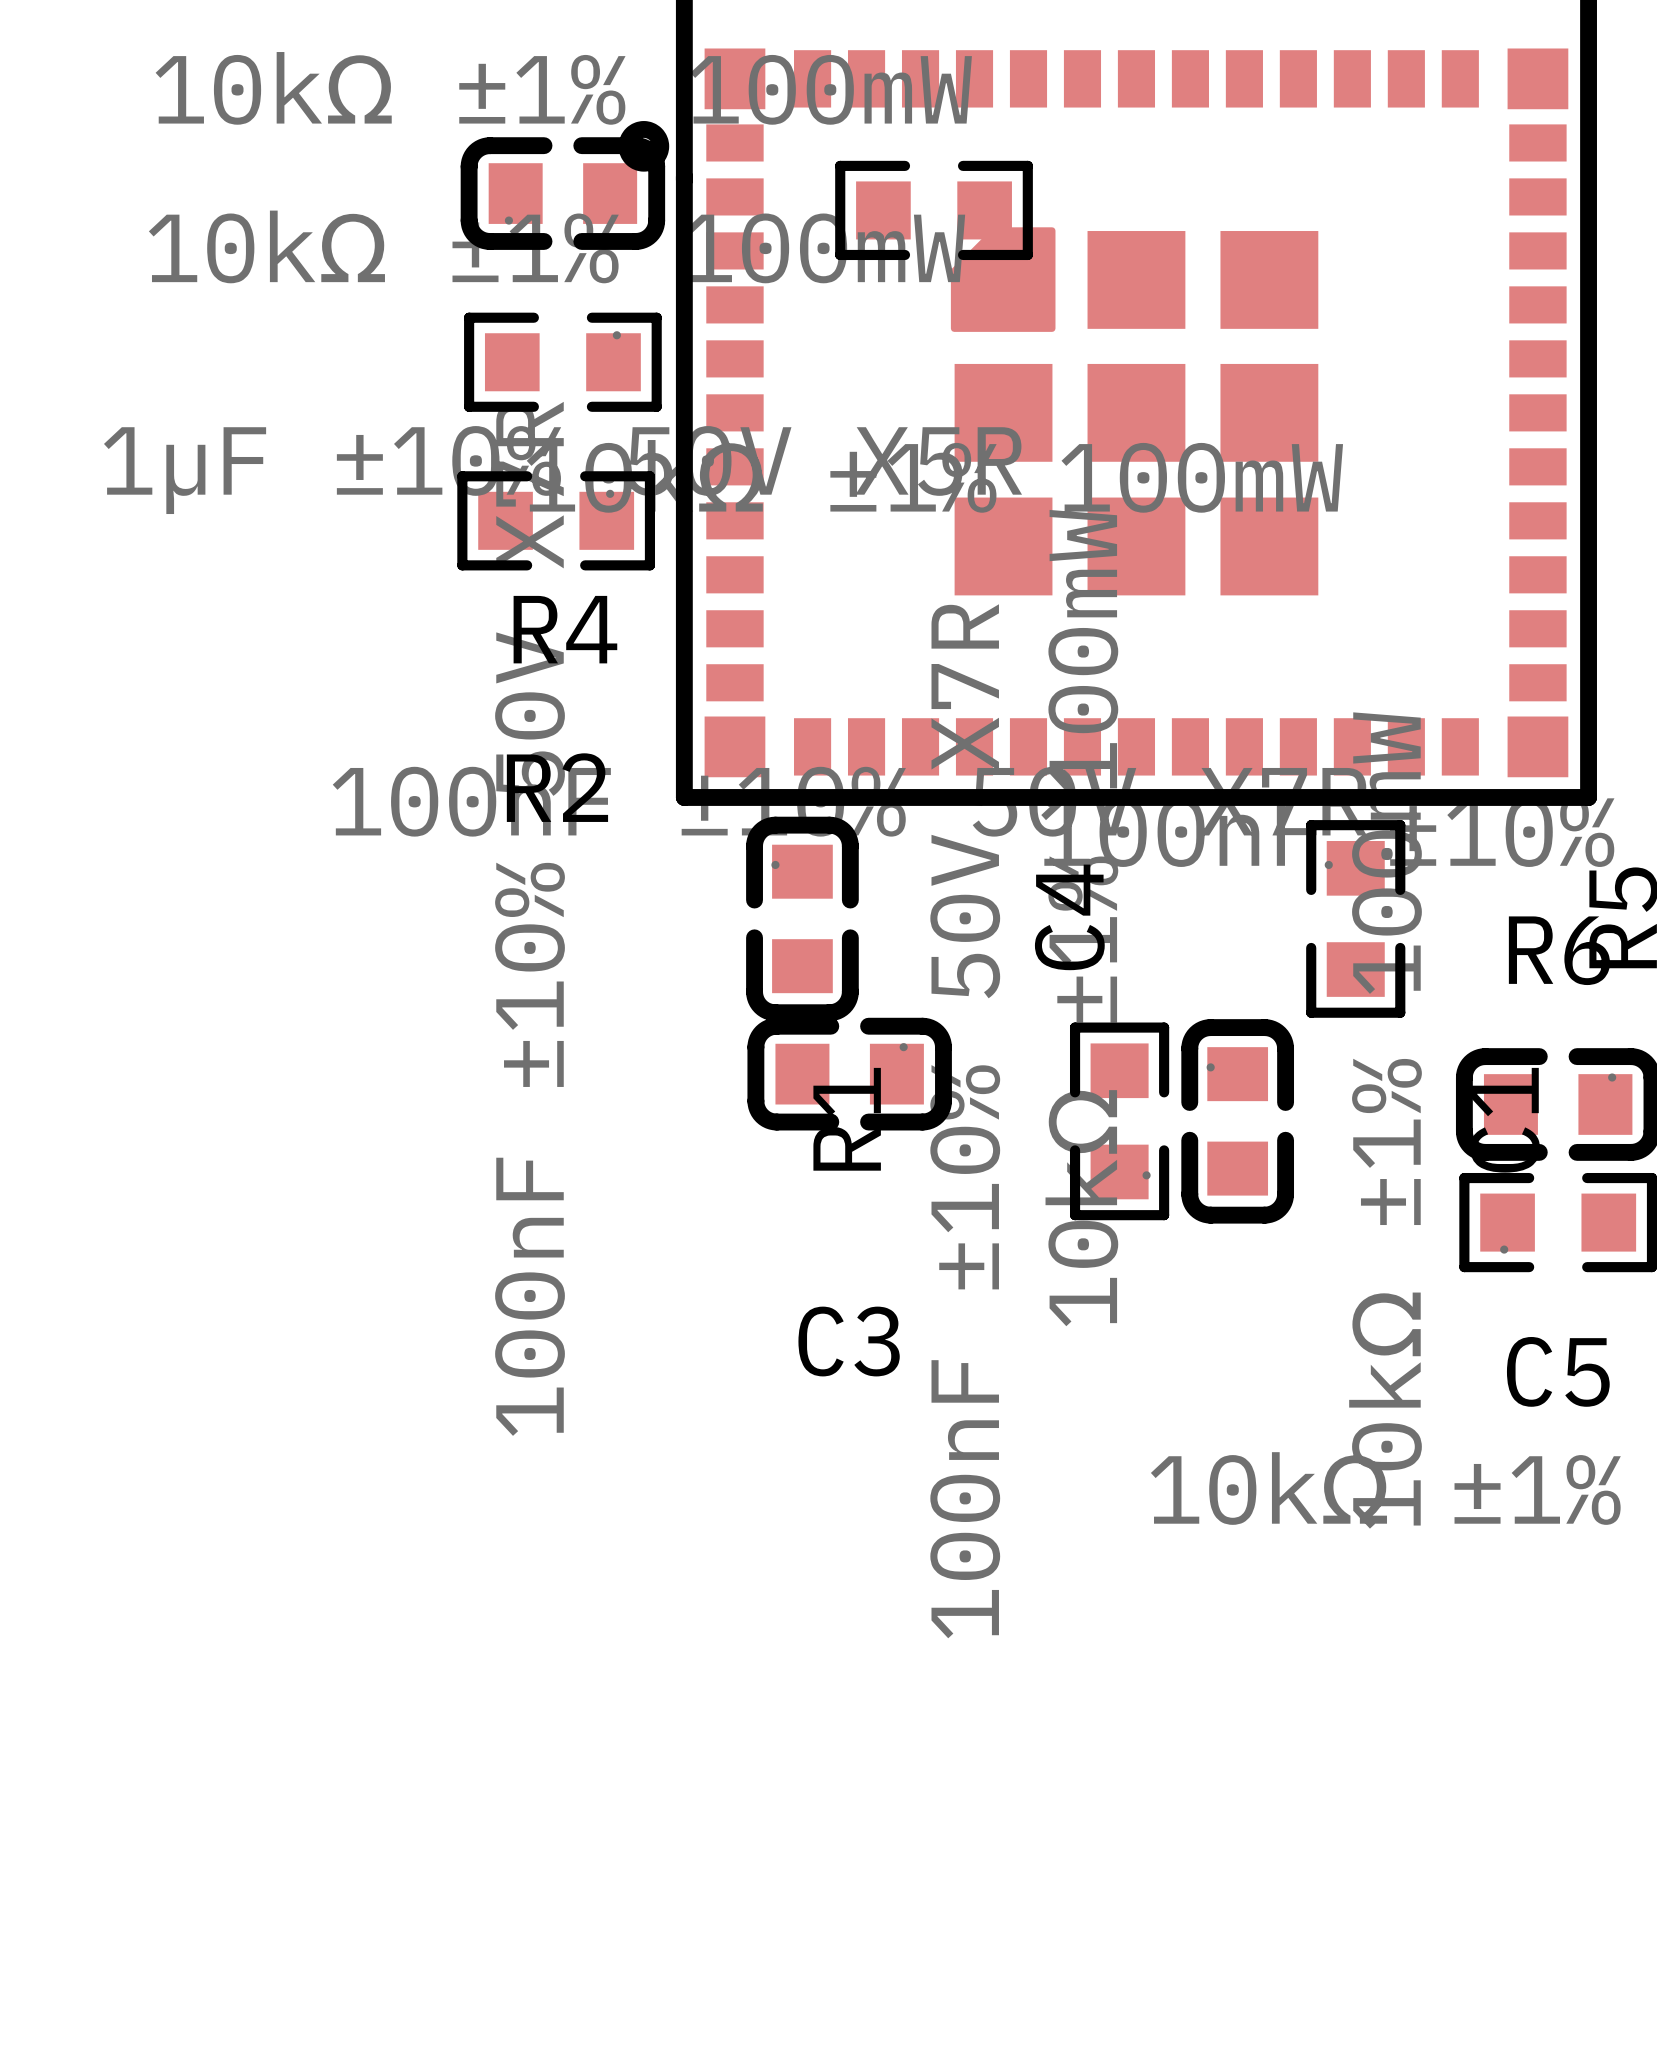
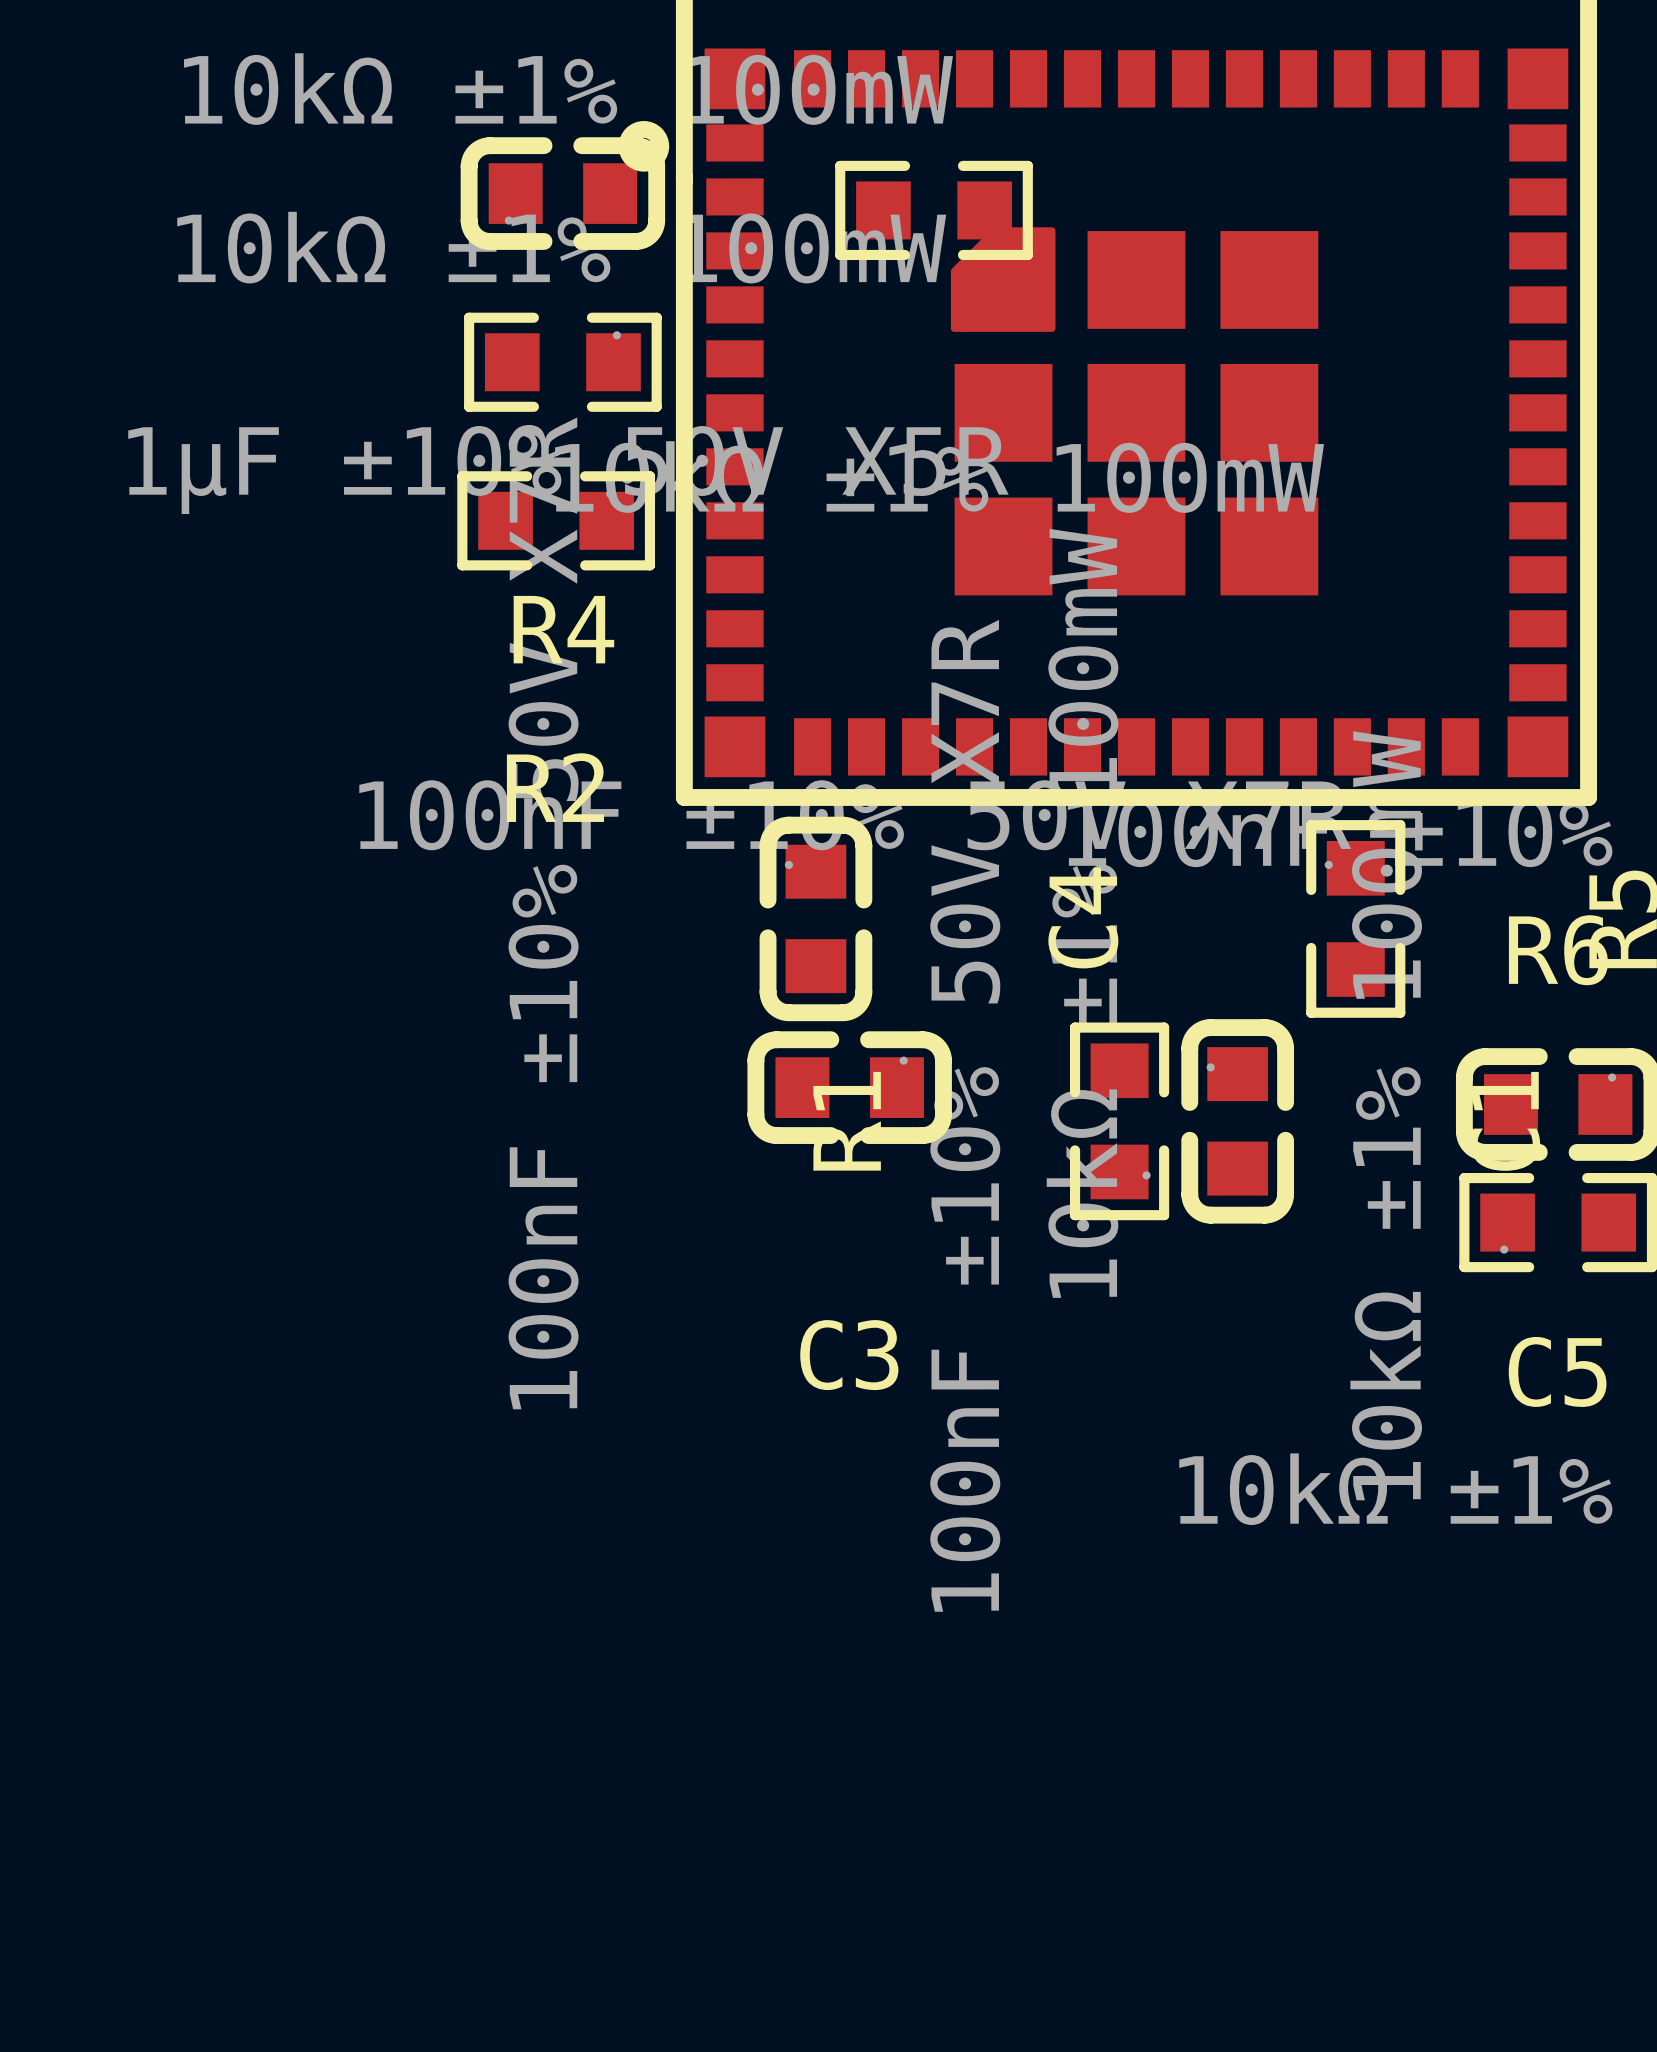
C4 position: (802, 918) -> (815, 918)
C3 position: (849, 1074) -> (849, 1087)

